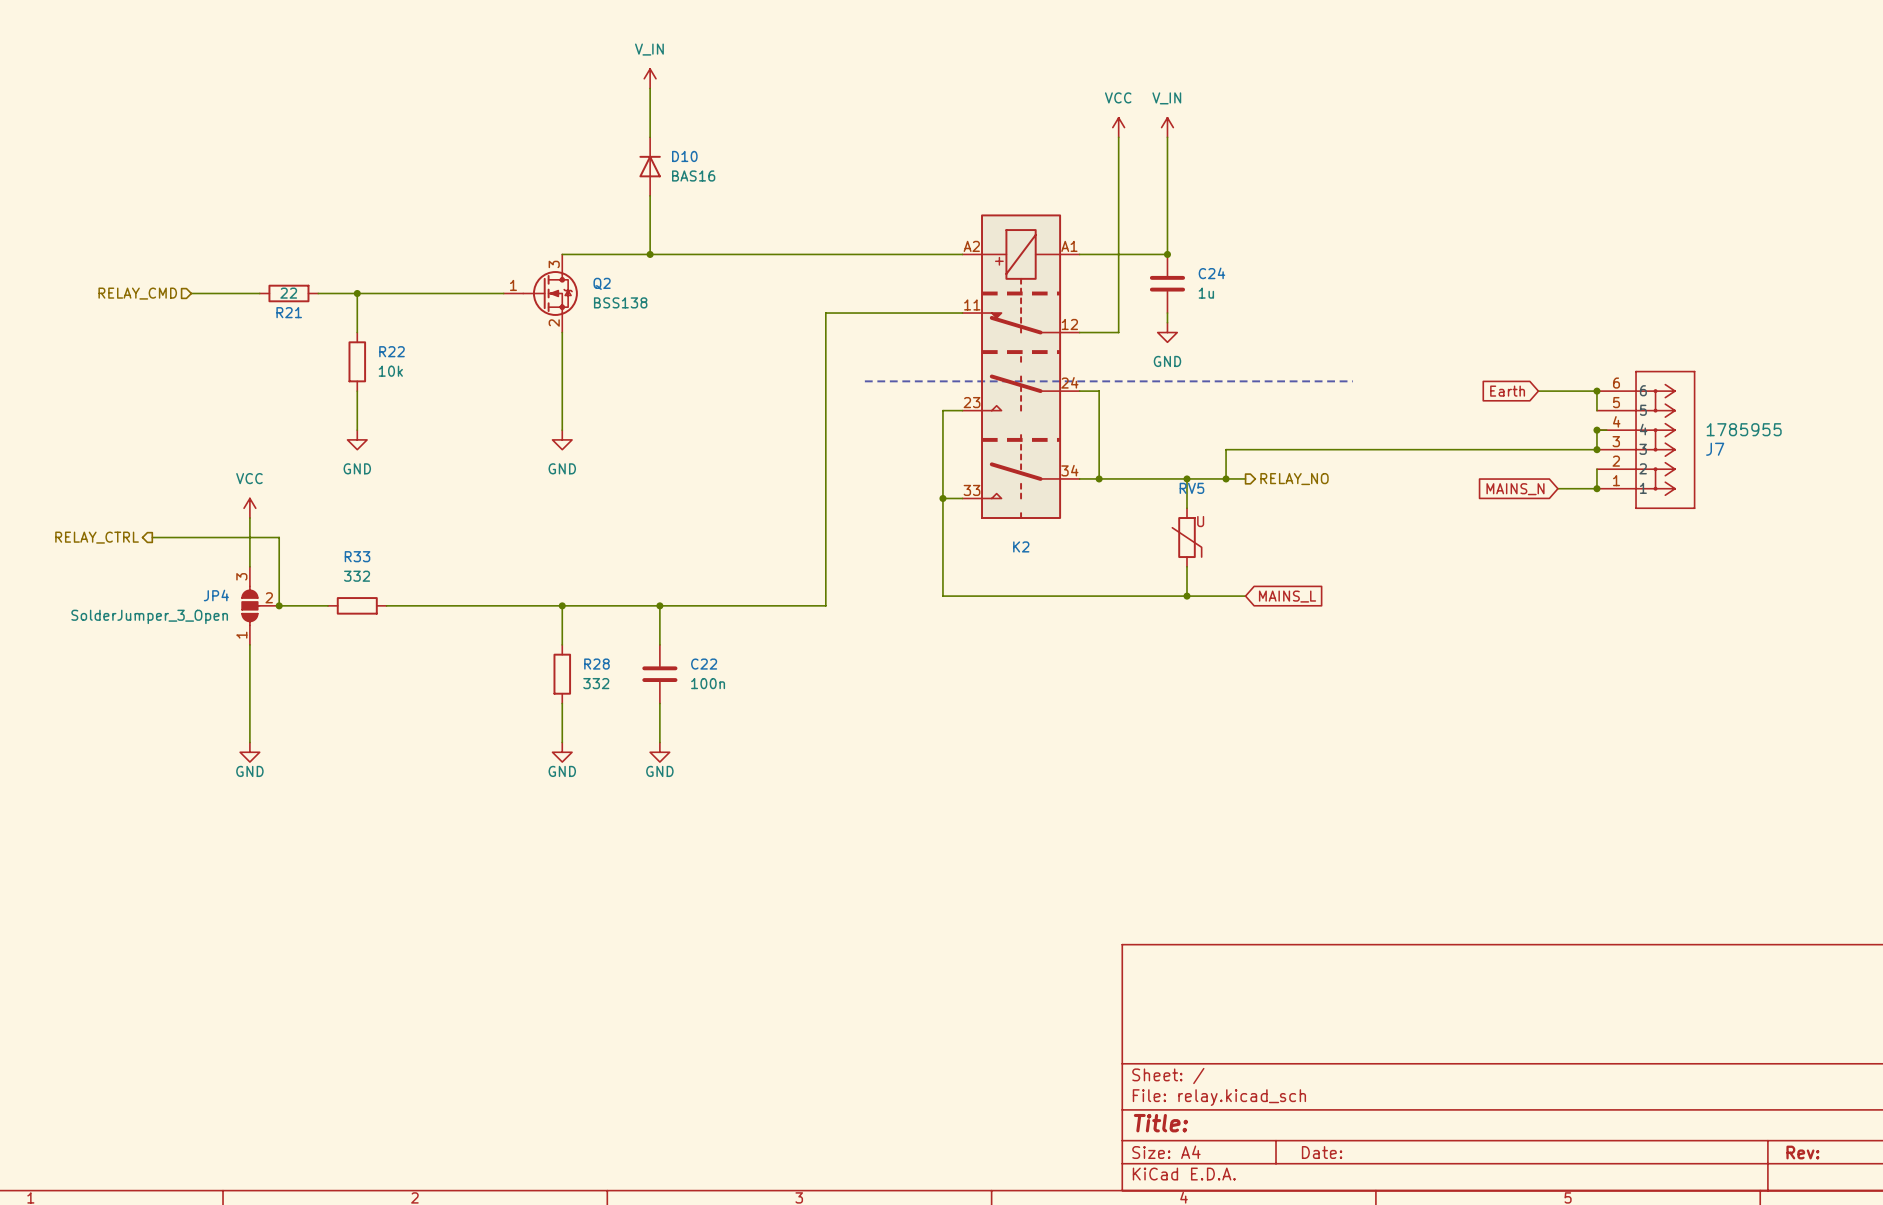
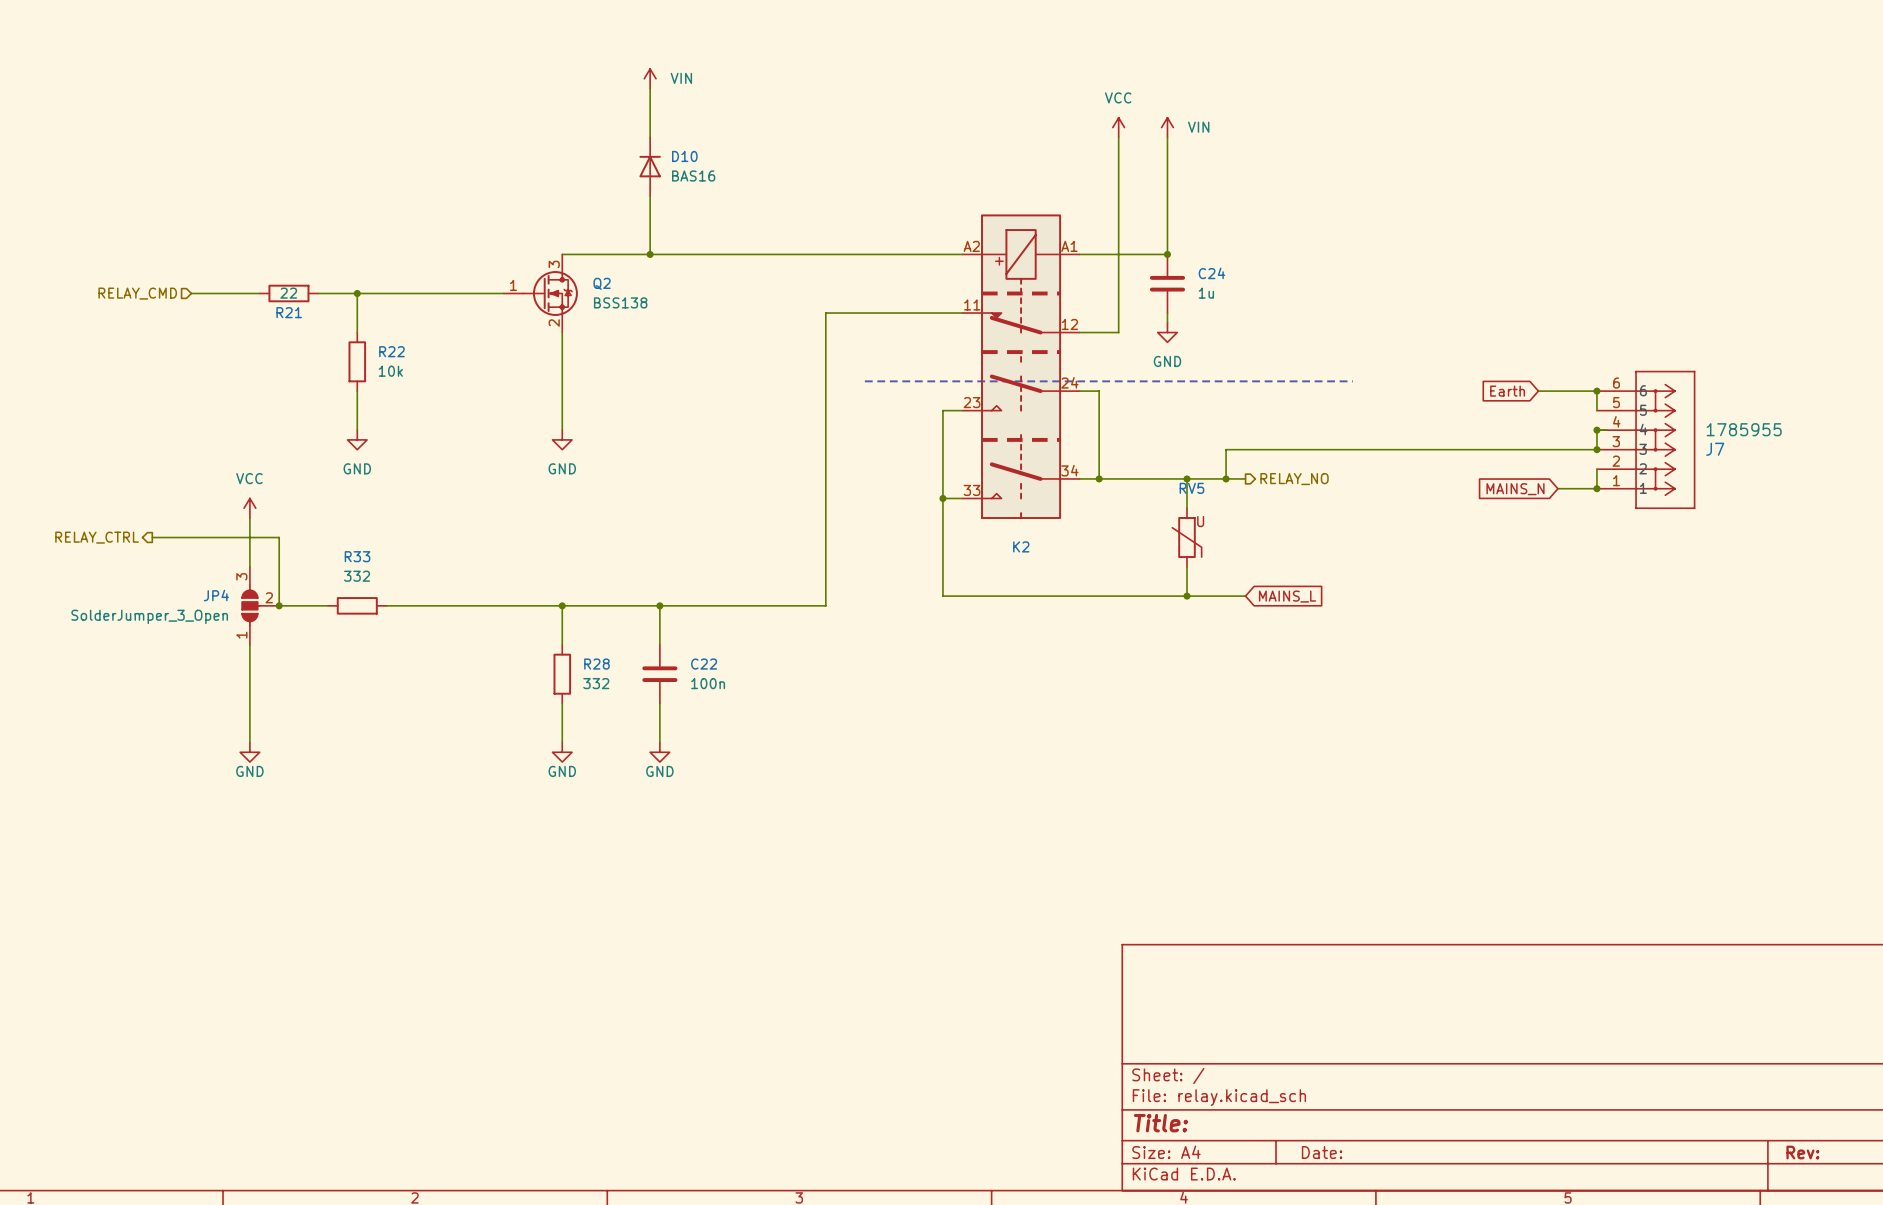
power symbol: V_IN (650, 78) -> VIN (650, 78)
power symbol: V_IN (1167, 127) -> VIN (1167, 127)

